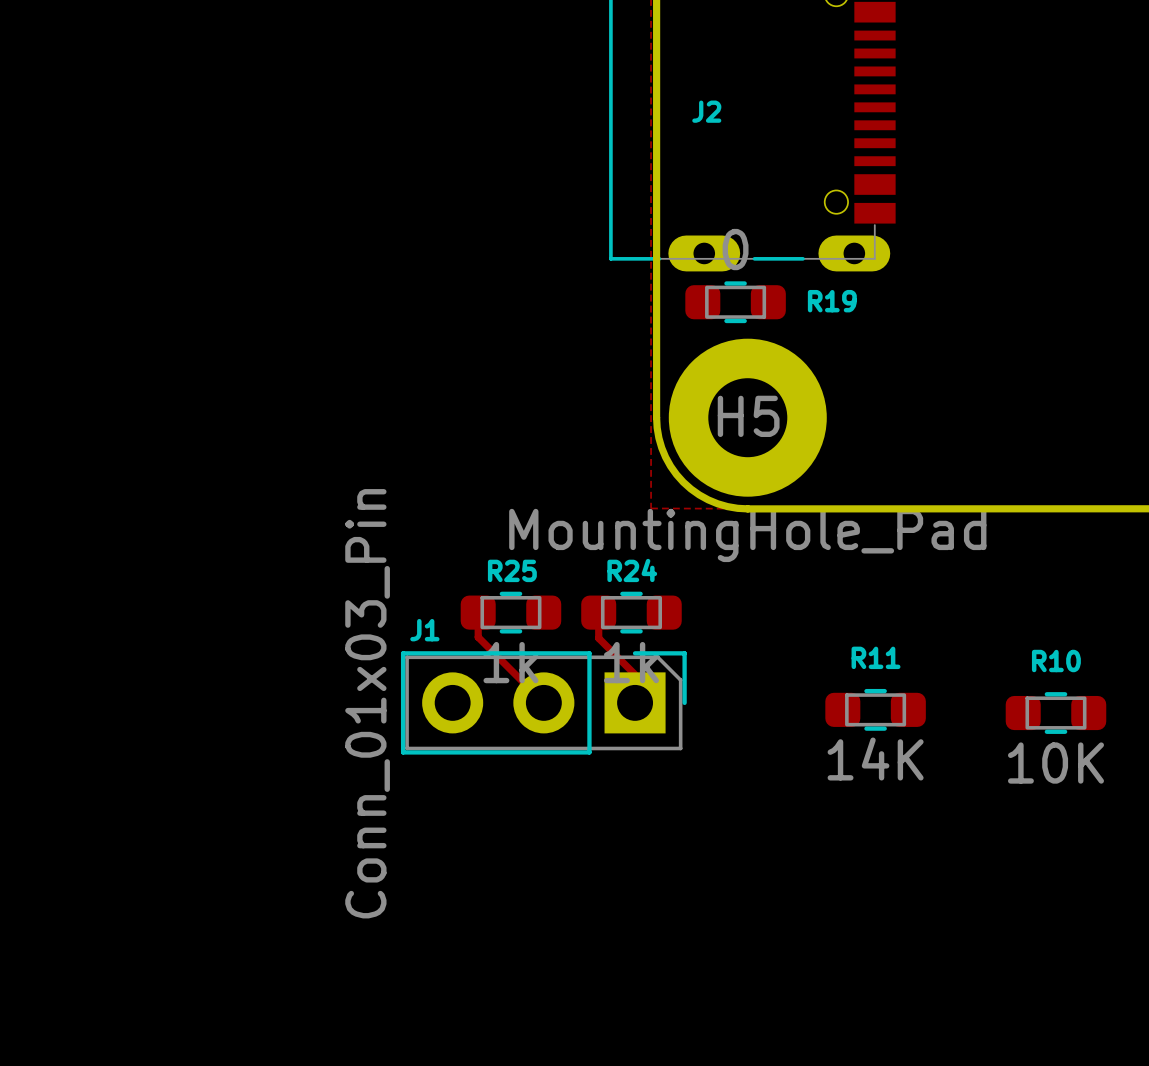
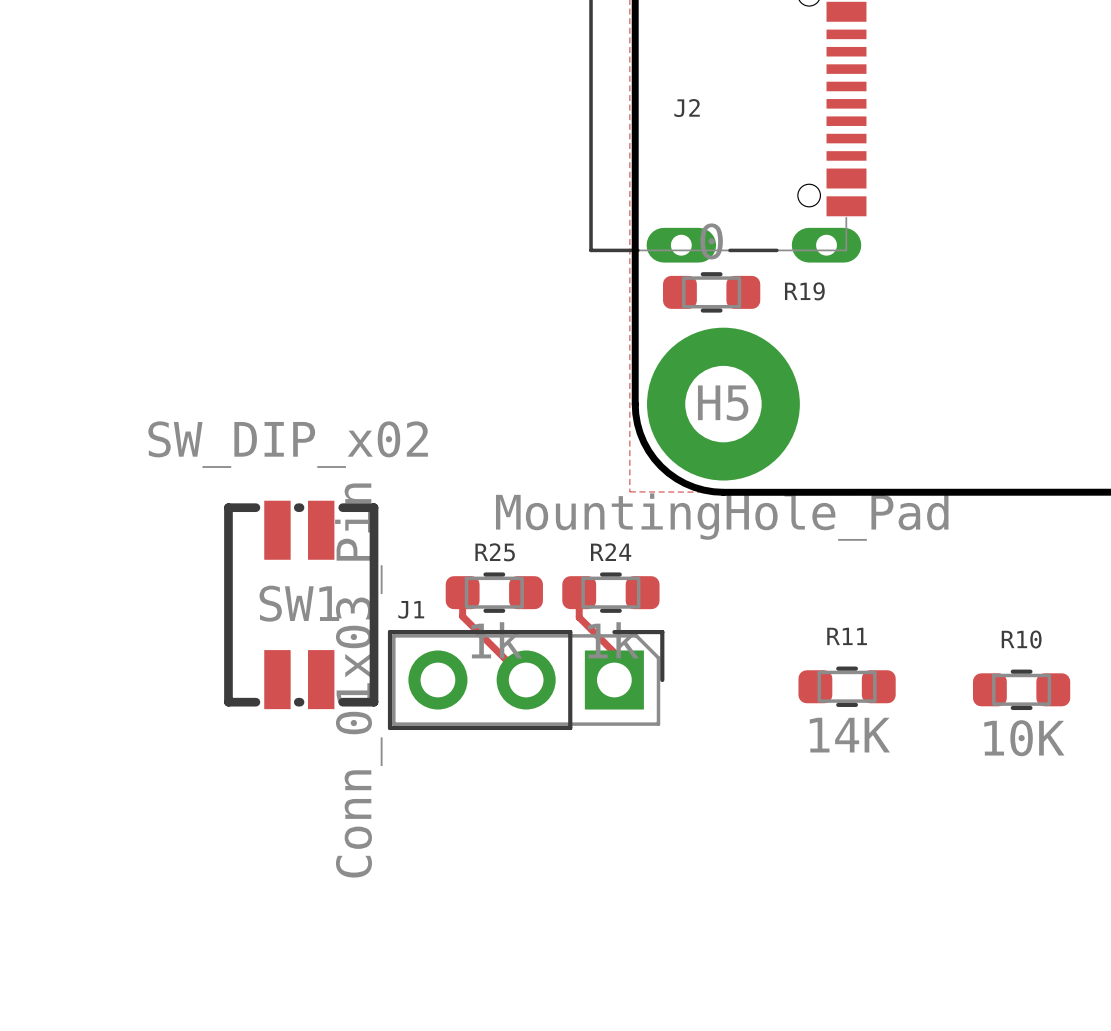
SW1: none -> SW_DIP_x02 (301, 604)

